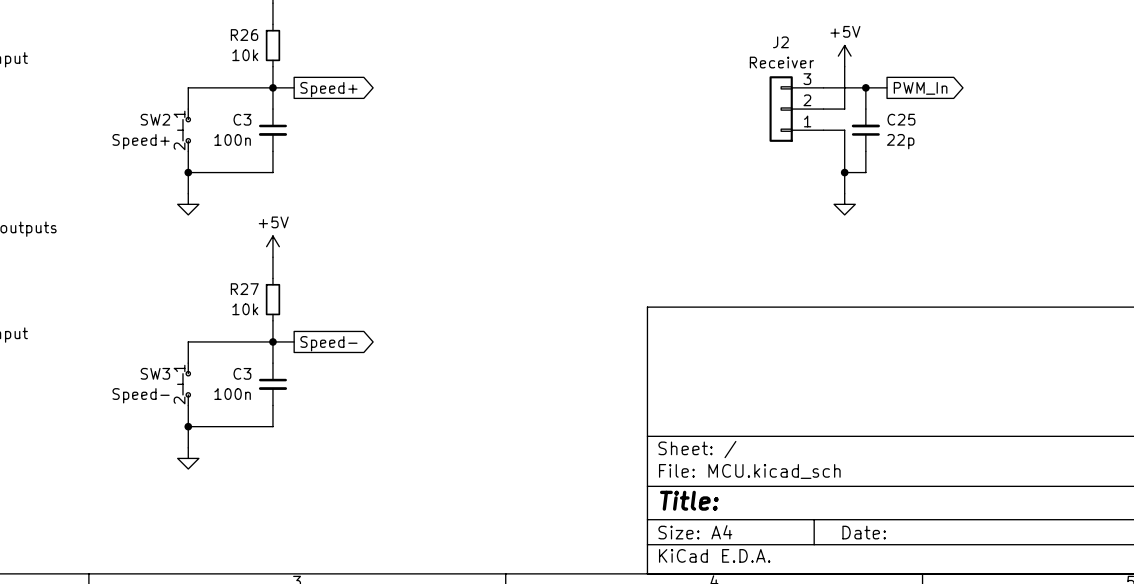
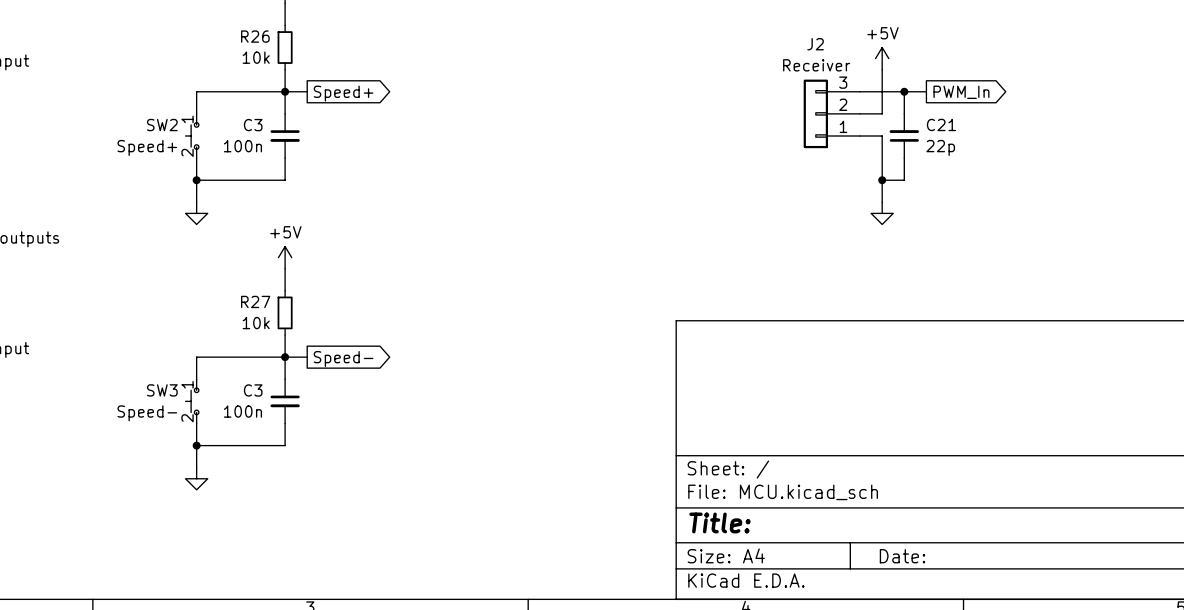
C25 name: C25 (901, 119) -> C21 (941, 124)

